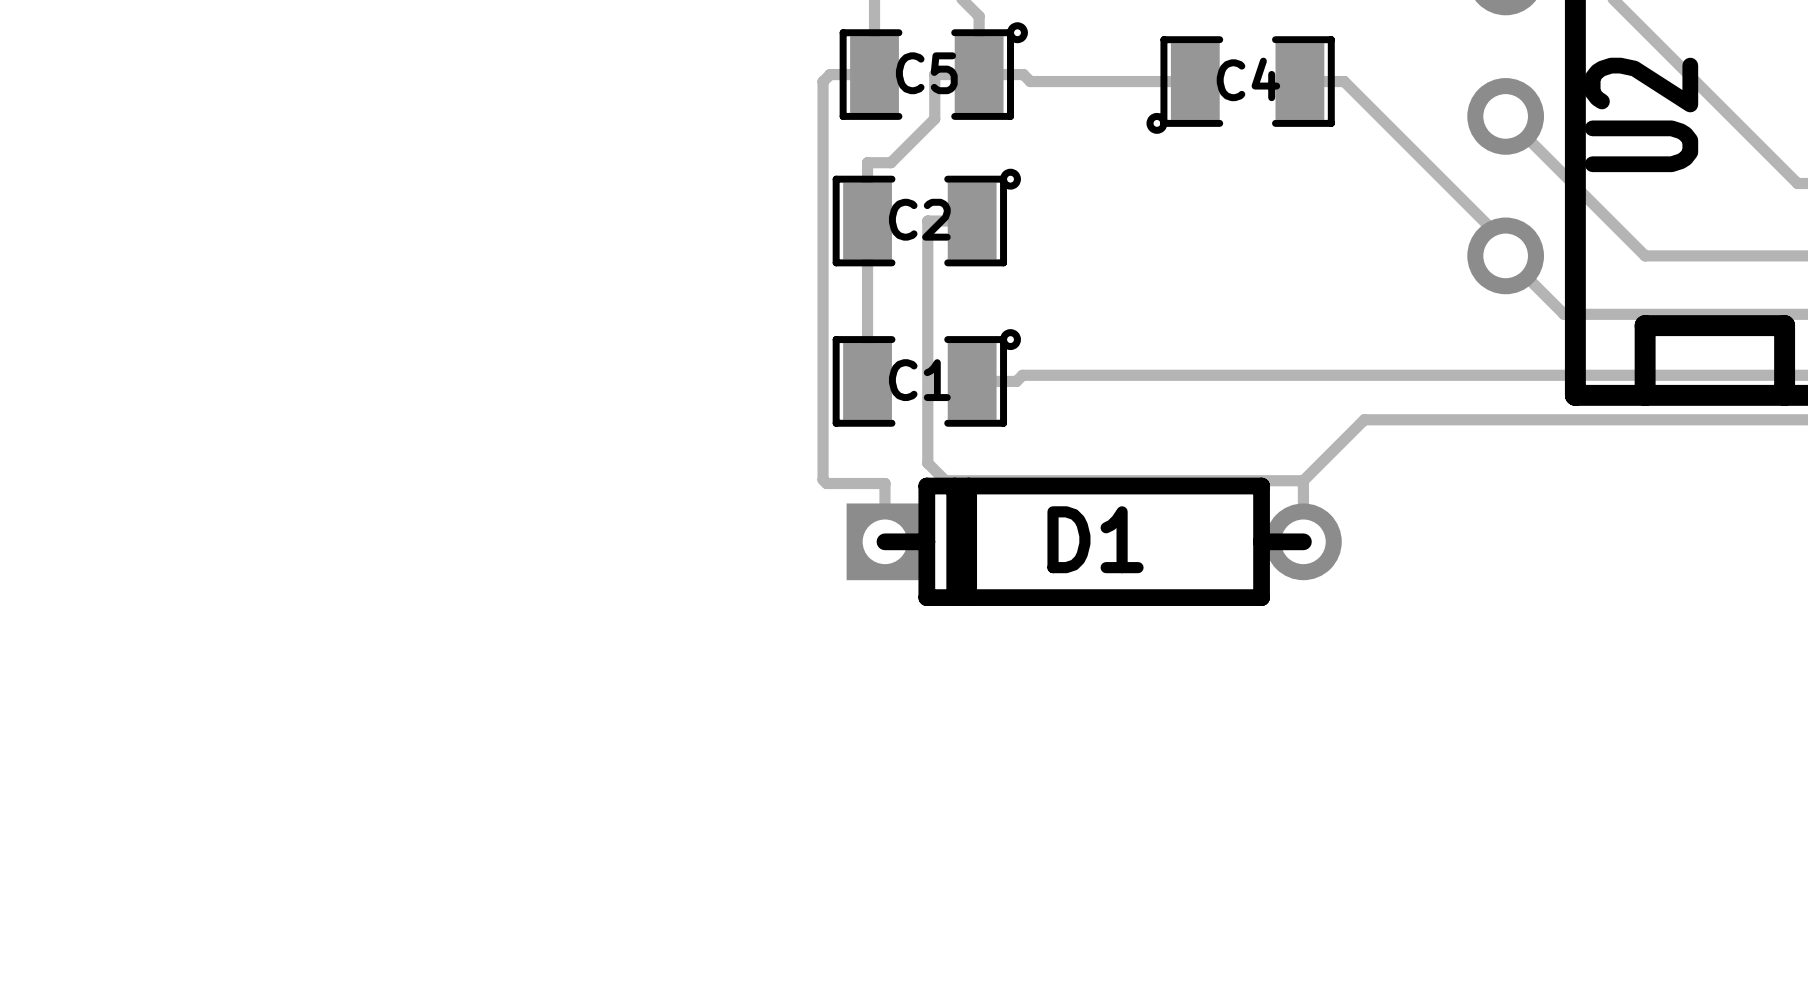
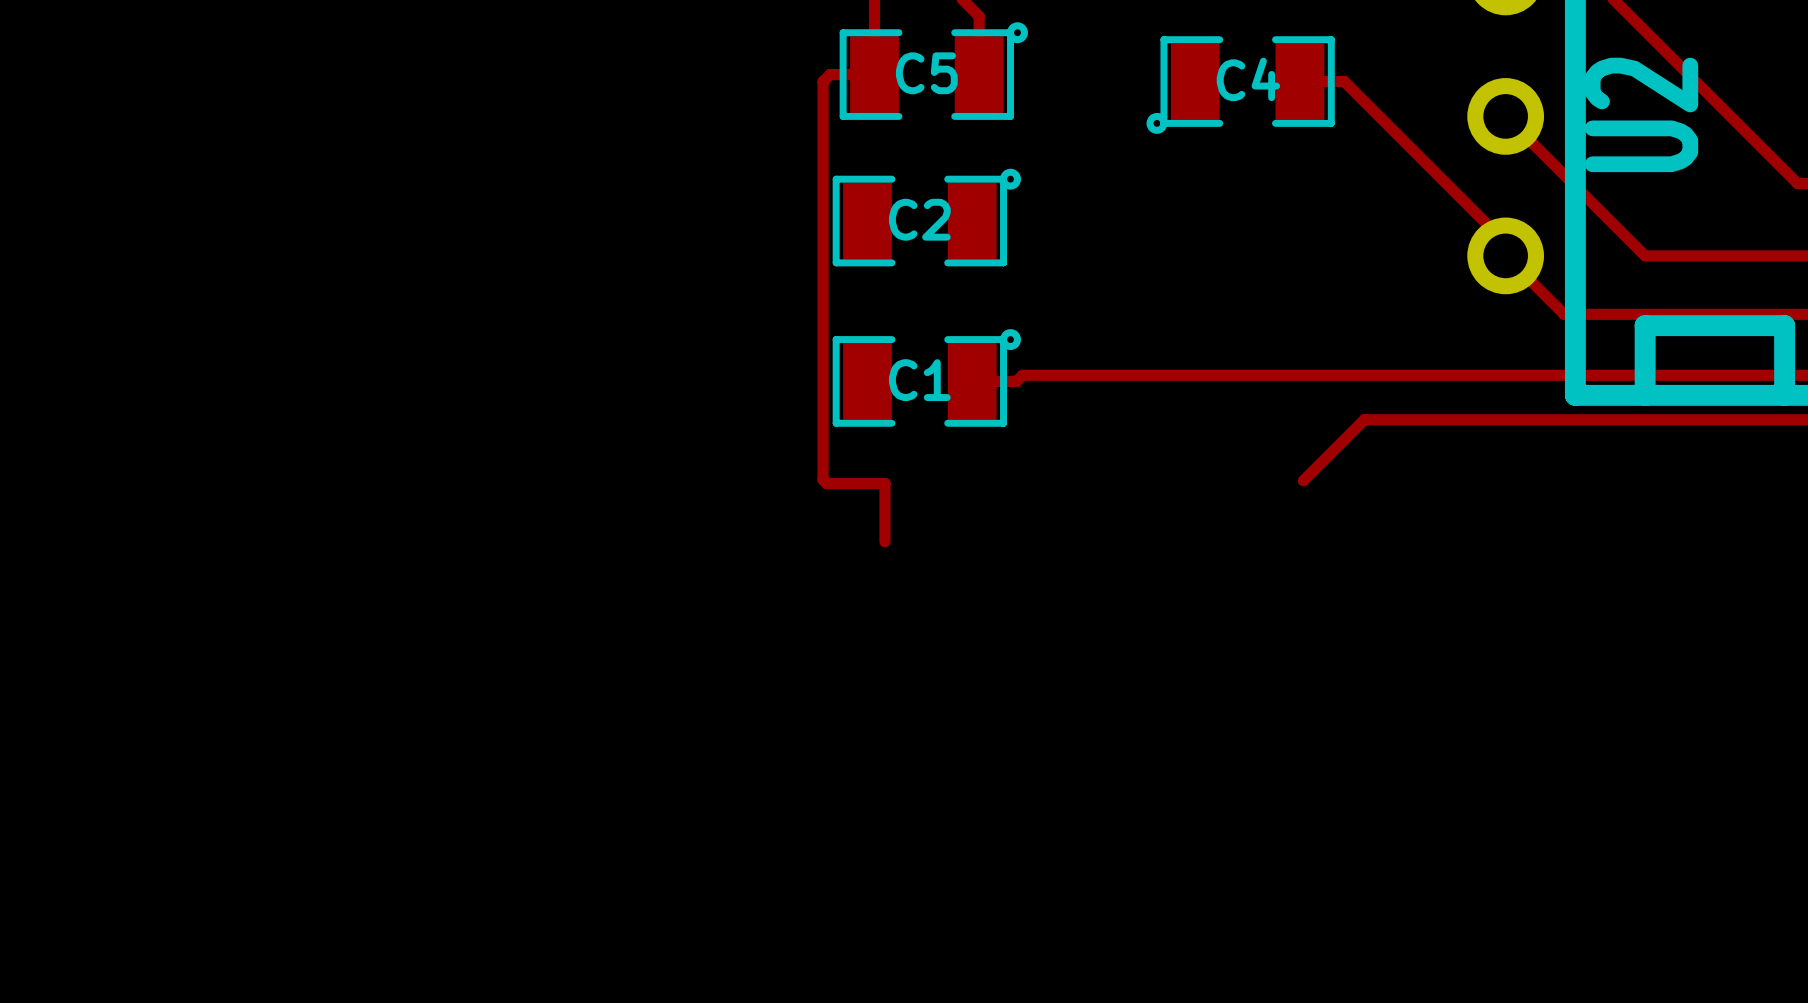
track: (1195, 81) (1030, 81) (1023, 74) (934, 74) (934, 118) (890, 162) (867, 162) (867, 381) -> none
track: (972, 221) (927, 221) (927, 463) (945, 480) (1303, 480) (1303, 541) -> none
D1: (1094, 541) -> none

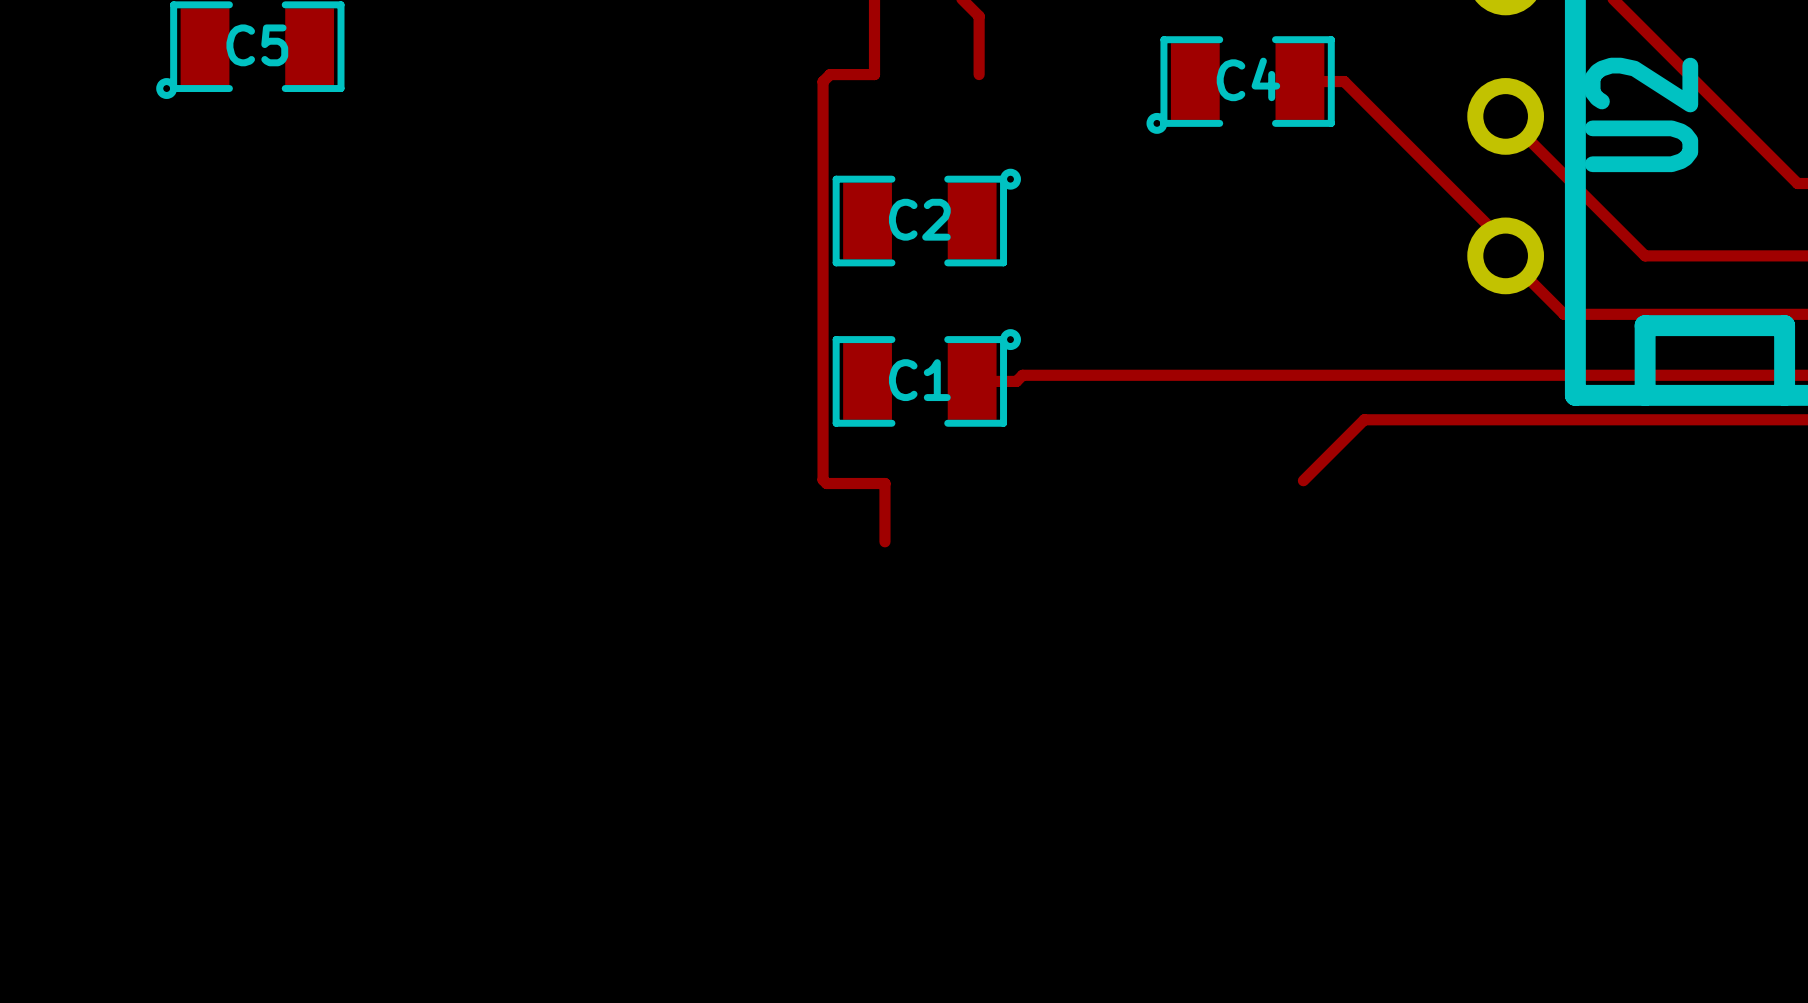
C5 rotation: 0° (933, 71) -> 180° (250, 50)
C5 position: (933, 71) -> (250, 50)

